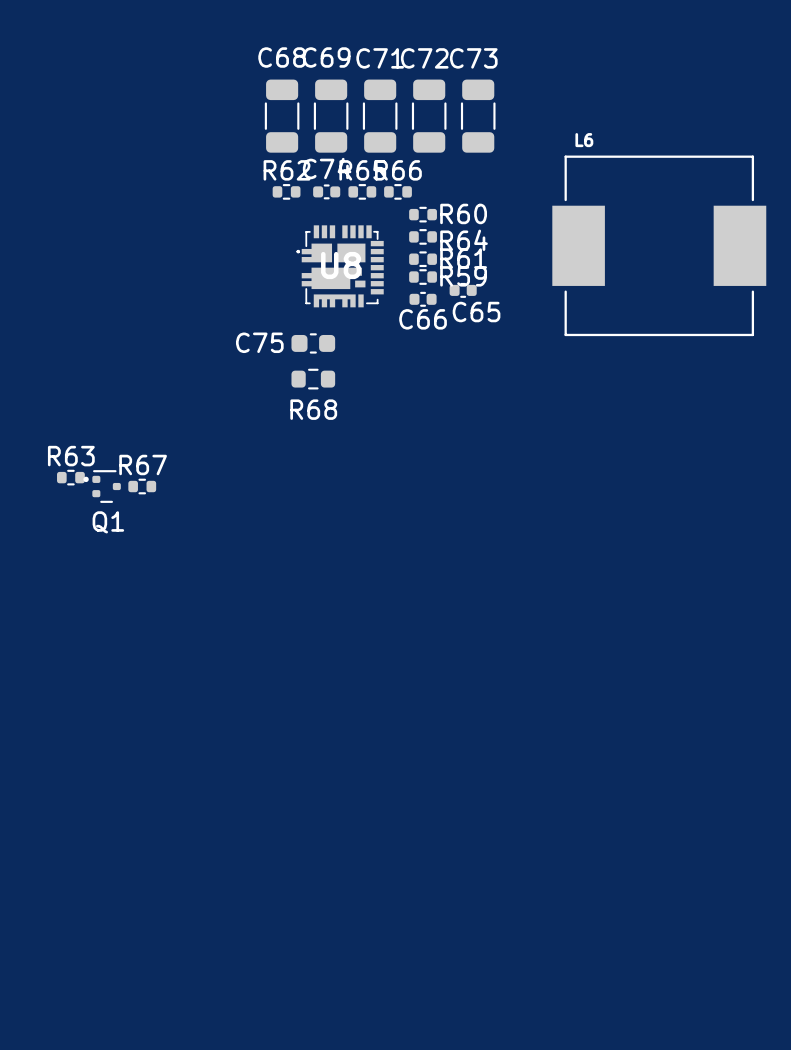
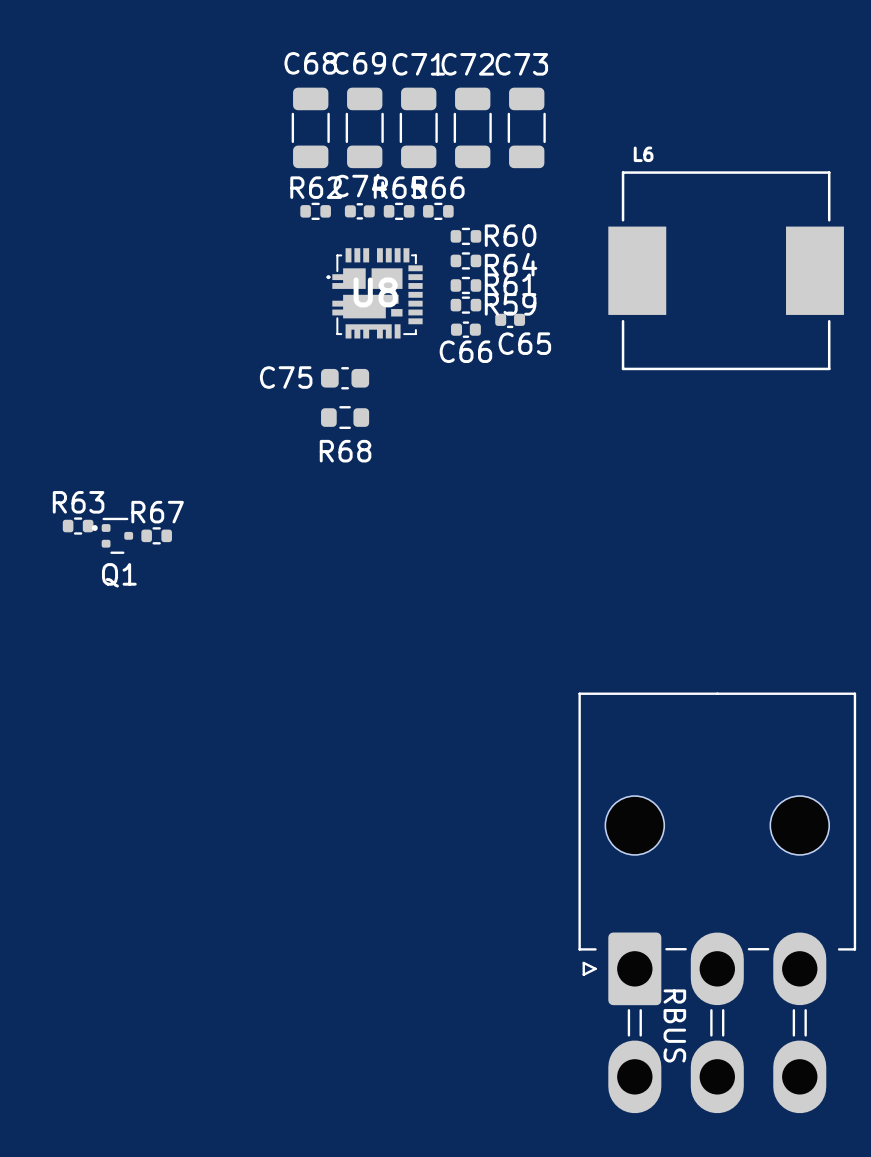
part: none -> (717, 902)

